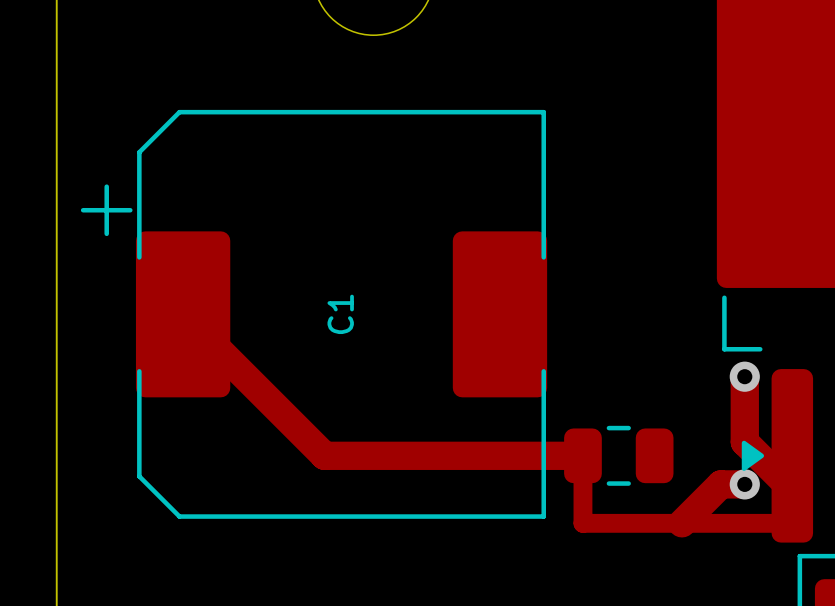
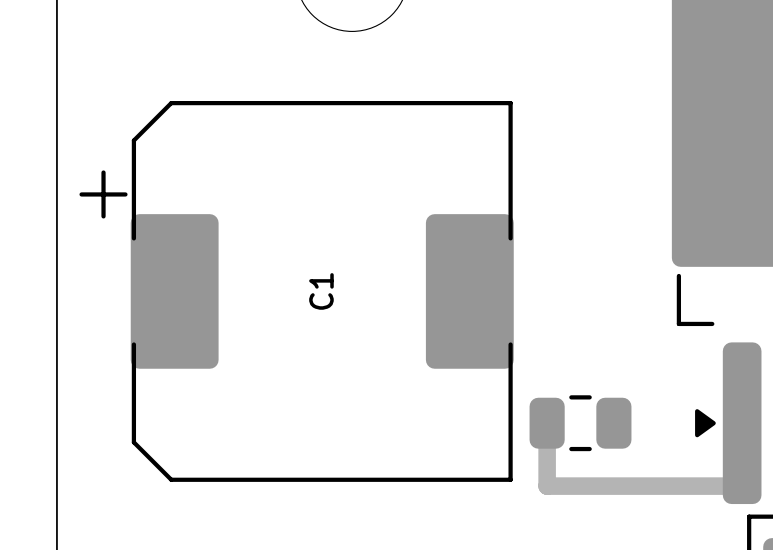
track: (183, 314) (324, 455) (582, 455) -> none
track: (744, 376) (744, 442) (792, 489) -> none
via: (744, 376) -> none
track: (744, 484) (720, 484) (682, 523) -> none
via: (744, 484) -> none

